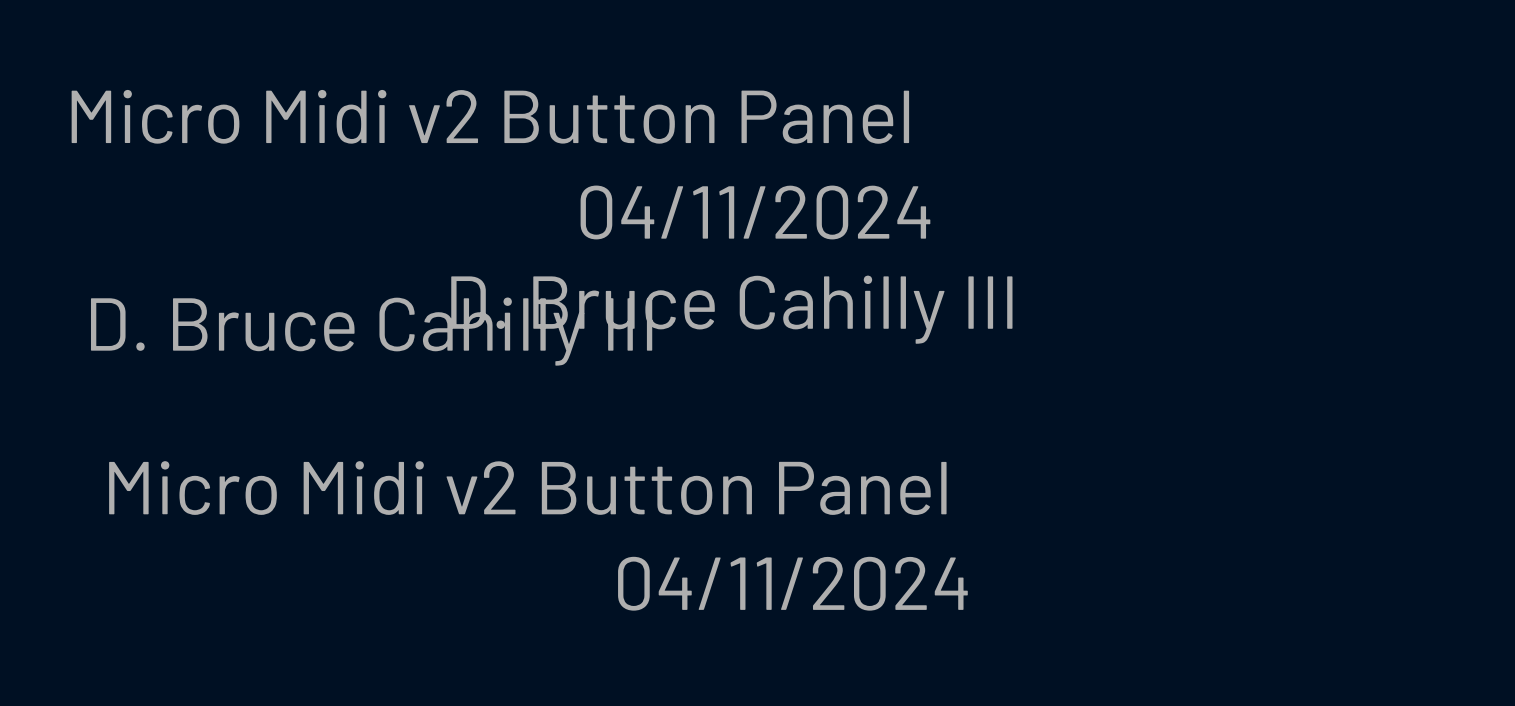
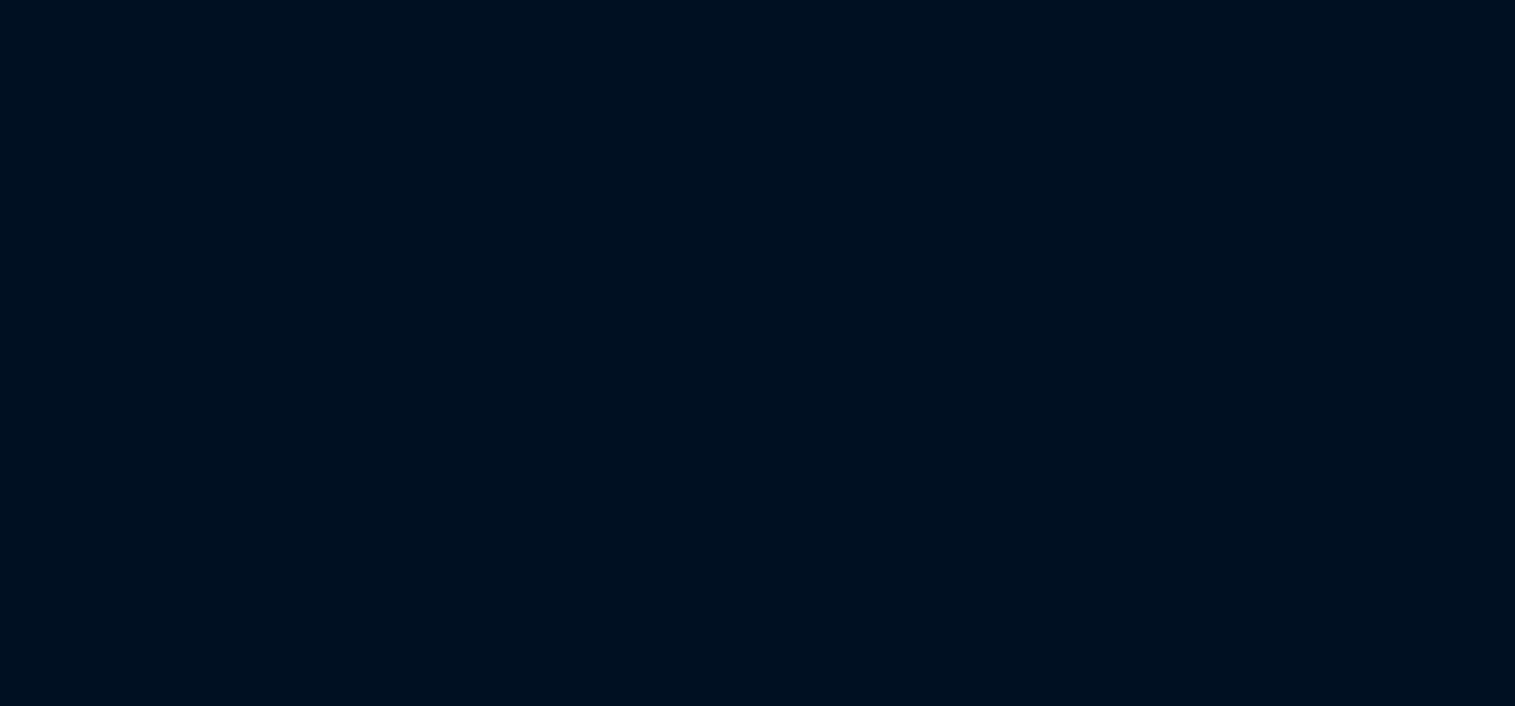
text: Micro Midi v2 Button Panel (490, 116) -> none
text: 04/11/2024 (755, 212) -> none
text: D. Bruce Cahilly III (731, 309) -> none
text: D. Bruce Cahilly III (371, 331) -> none
text: Micro Midi v2 Button Panel (527, 488) -> none
text: 04/11/2024 (792, 583) -> none

